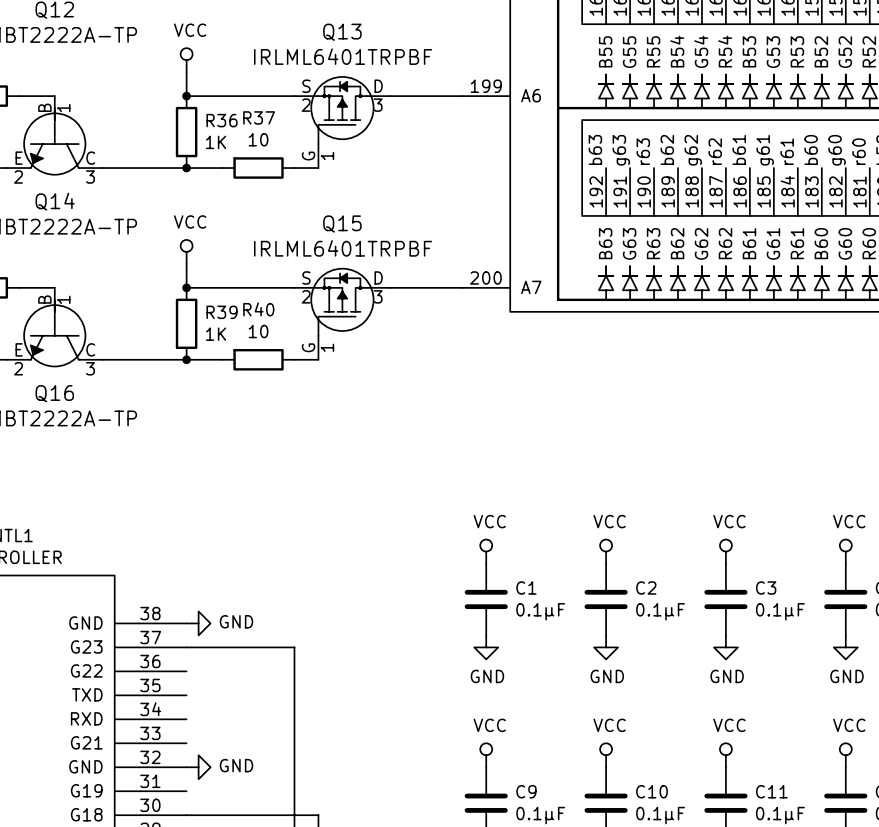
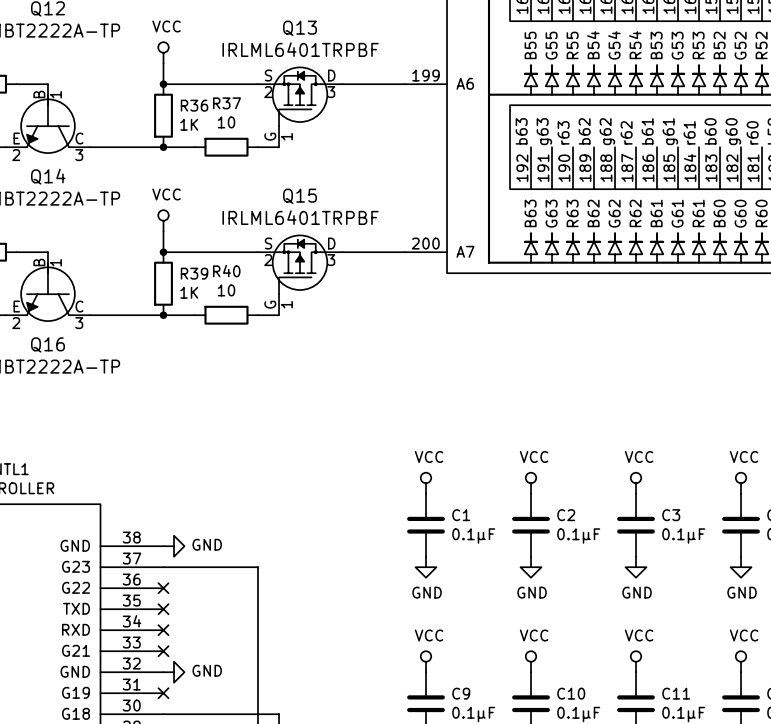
no-connect mark: none -> (163, 588)
no-connect mark: none -> (163, 609)
no-connect mark: none -> (163, 630)
no-connect mark: none -> (163, 651)
no-connect mark: none -> (163, 693)

